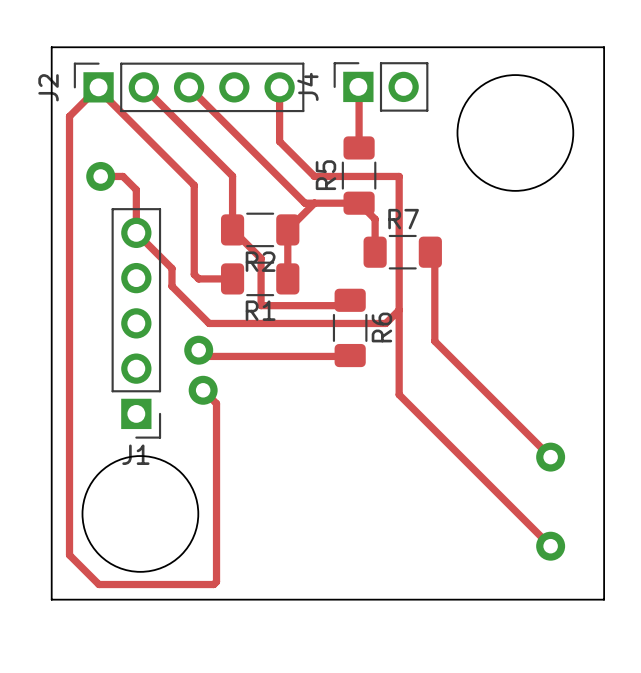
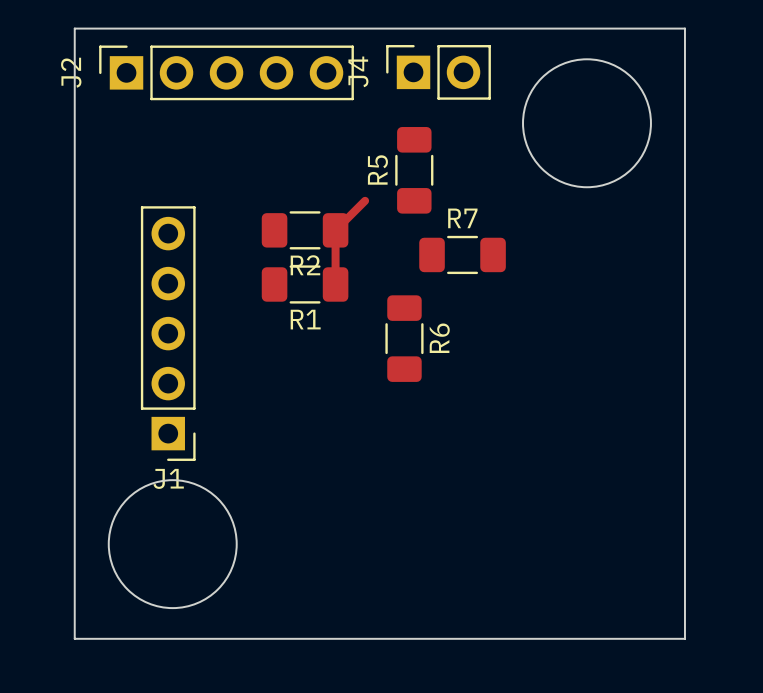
track: (358, 86) (359, 147) -> none
track: (143, 87) (232, 176) (232, 229) (261, 258) (261, 305) (336, 305) (341, 301) -> none
track: (189, 87) (304, 203) (359, 203) (375, 219) (375, 252) -> none
track: (279, 87) (279, 141) (314, 176) (399, 176) (399, 394) (550, 546) -> none
track: (91, 176) (122, 176) (136, 189) (136, 232) (171, 268) (171, 286) (209, 323) (385, 323) (399, 310) -> none
via: (100, 176) -> none
track: (434, 265) (434, 341) (550, 457) -> none
track: (232, 278) (198, 278) (194, 274) (194, 185) (98, 89) (98, 87) (69, 116) (69, 555) (98, 584) (213, 584) (216, 581) (216, 403) (203, 390) -> none
track: (198, 350) (204, 356) (341, 356) -> none
via: (198, 350) -> none
via: (203, 390) -> none
via: (550, 457) -> none
via: (550, 546) -> none

